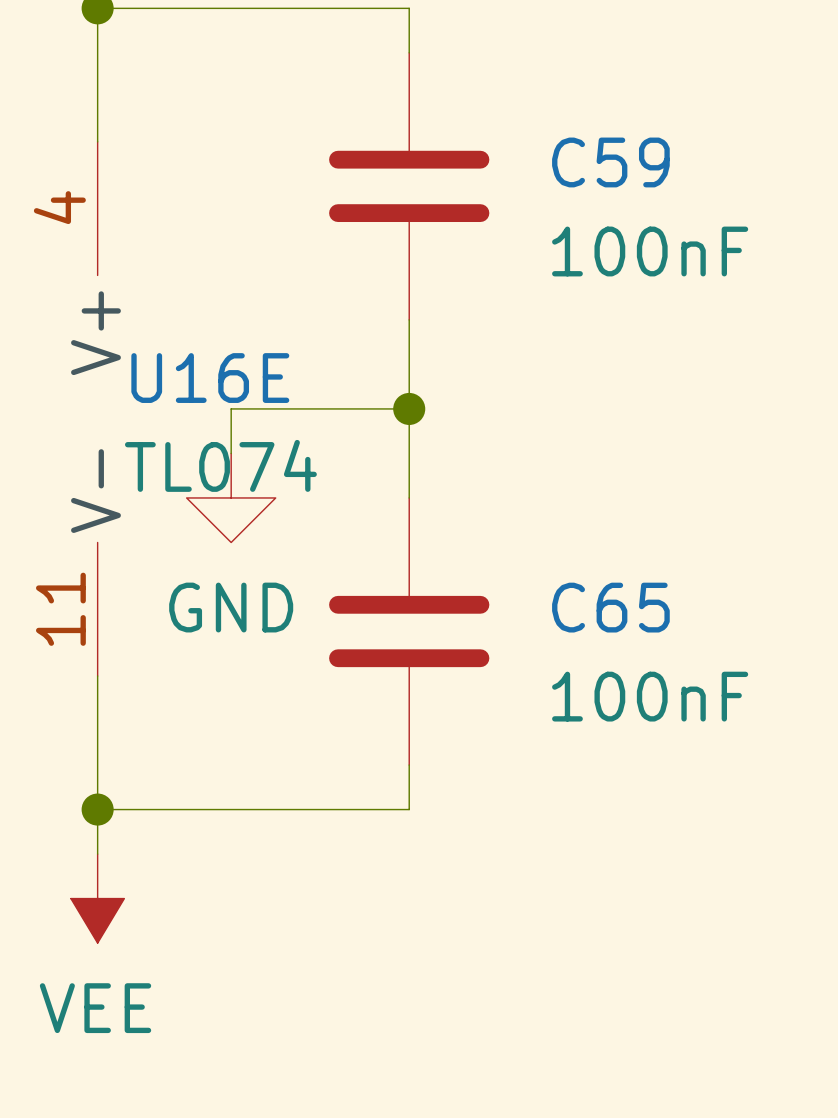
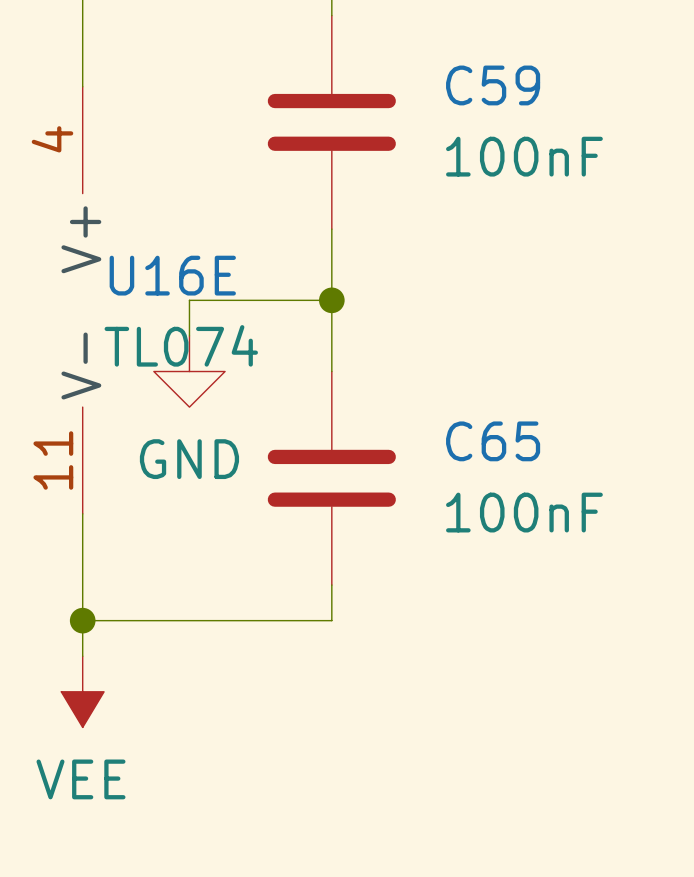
C59 name position: C59 (610, 162) -> C59 (493, 85)
C59 value position: 100nF (650, 251) -> 100nF (524, 156)
C65 name position: C65 (610, 607) -> C65 (493, 441)
C65 value position: 100nF (650, 696) -> 100nF (524, 512)

